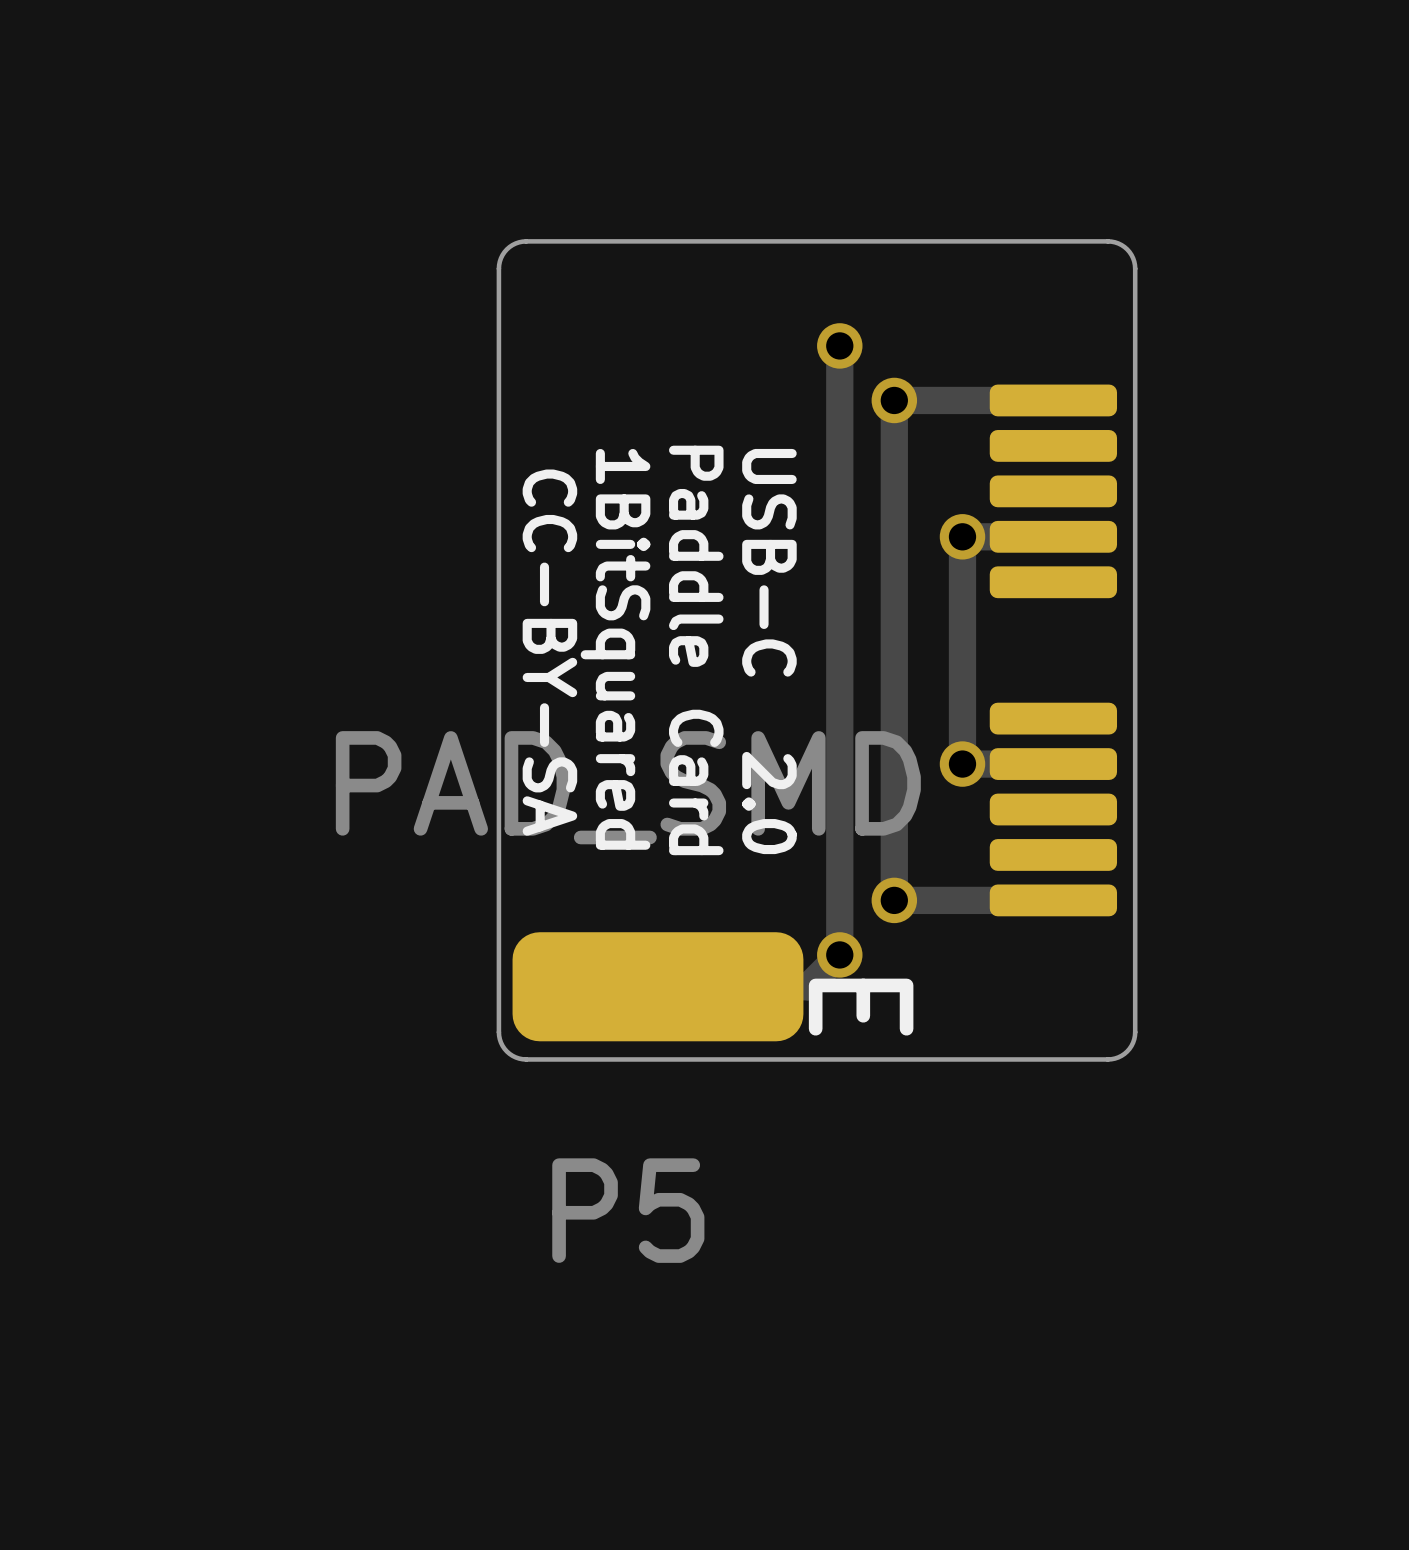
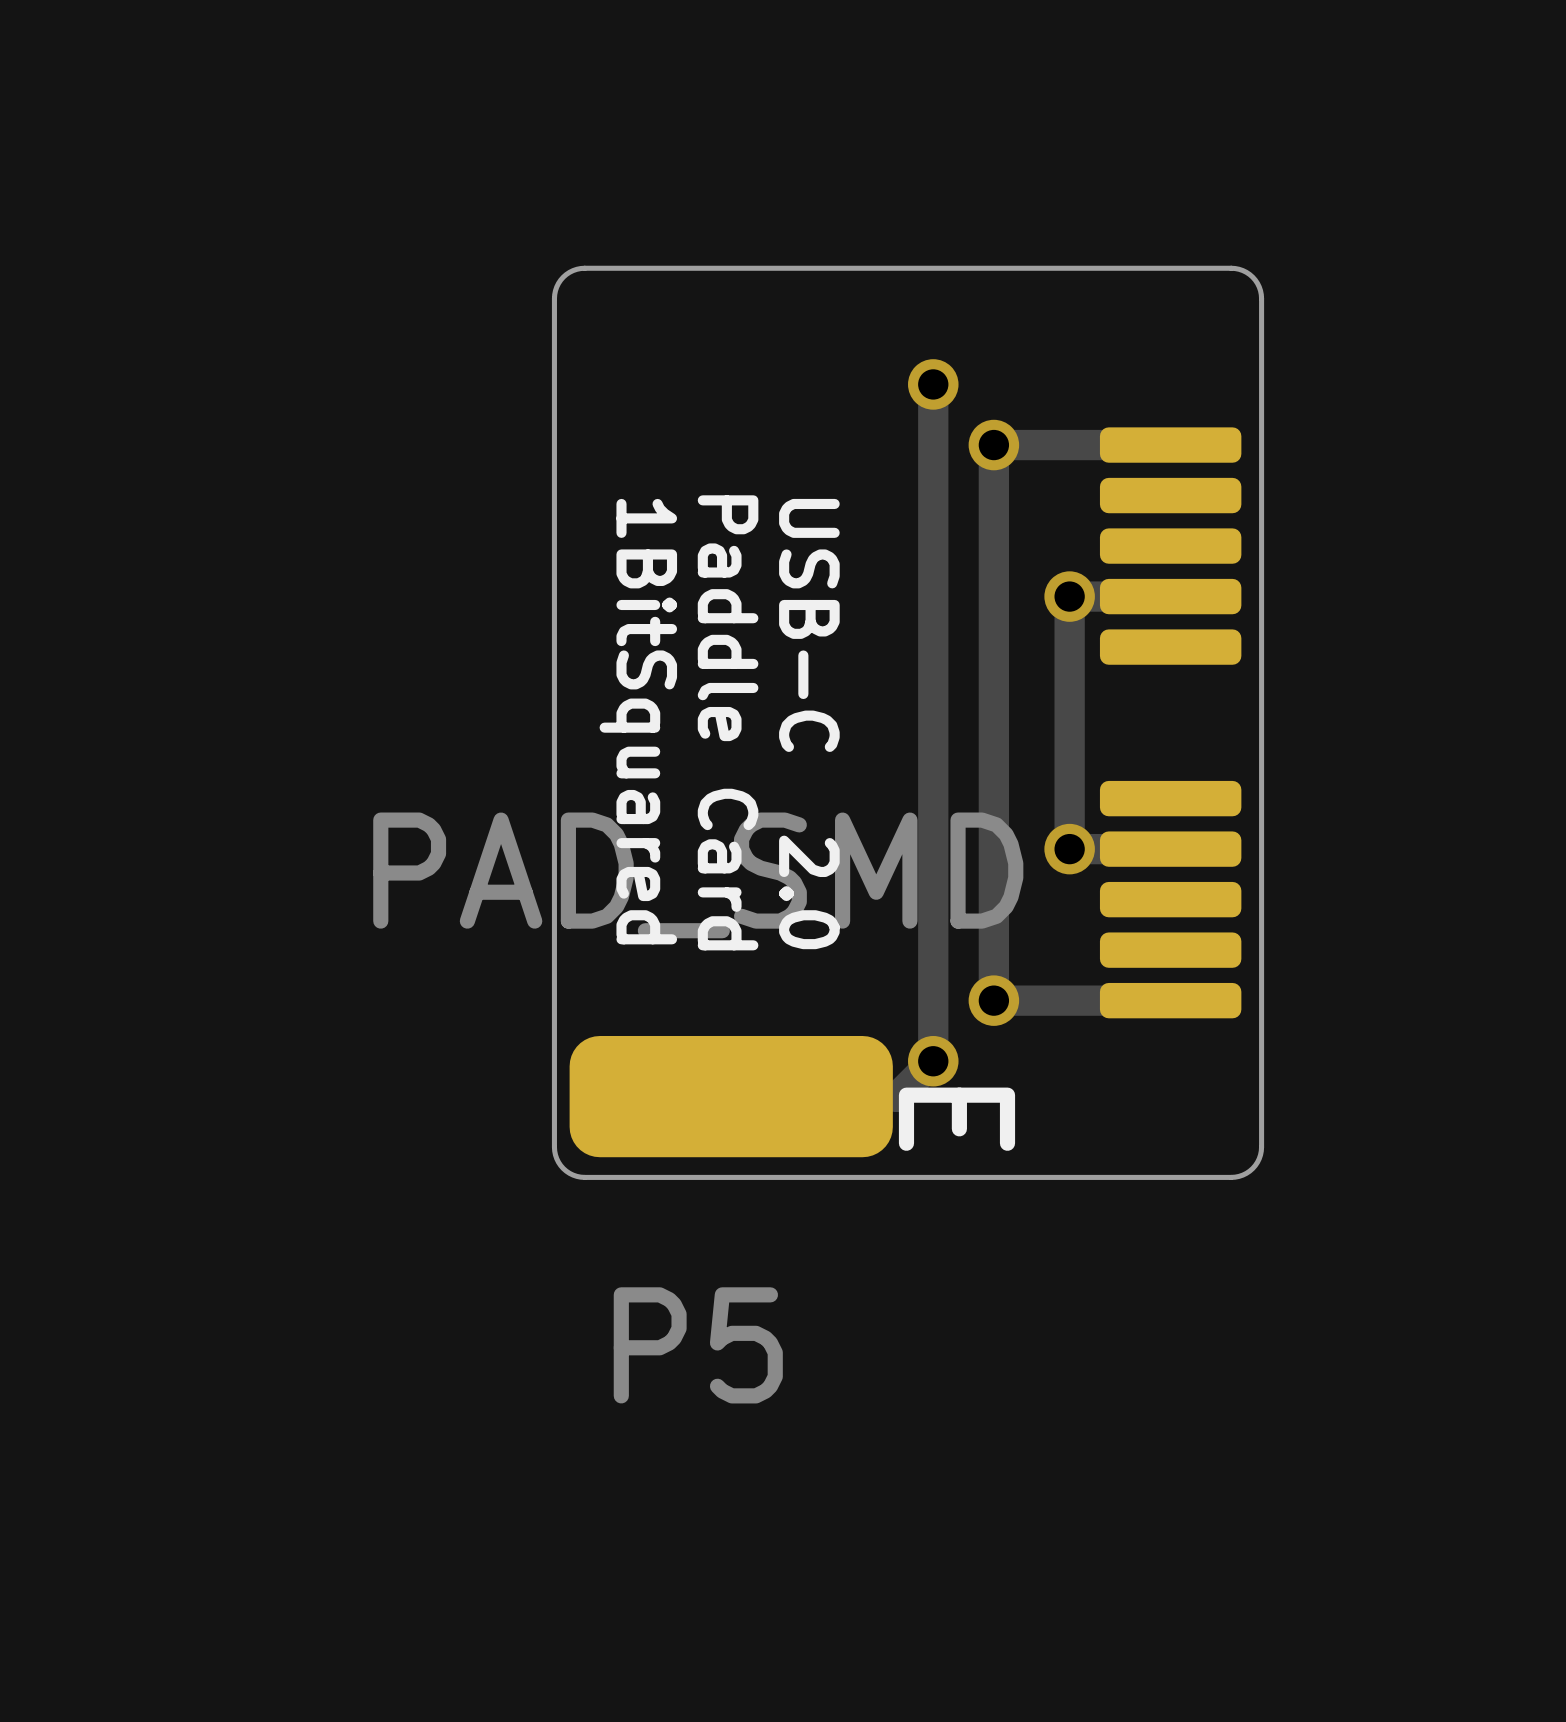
text position: 1BitSquared (615, 649) -> 1BitSquared (638, 721)
text position: Paddle Card (696, 650) -> Paddle Card (728, 722)
text position: USB-C 2.0 (769, 651) -> USB-C 2.0 (809, 724)
text: CC-BY-SA (549, 652) -> none

